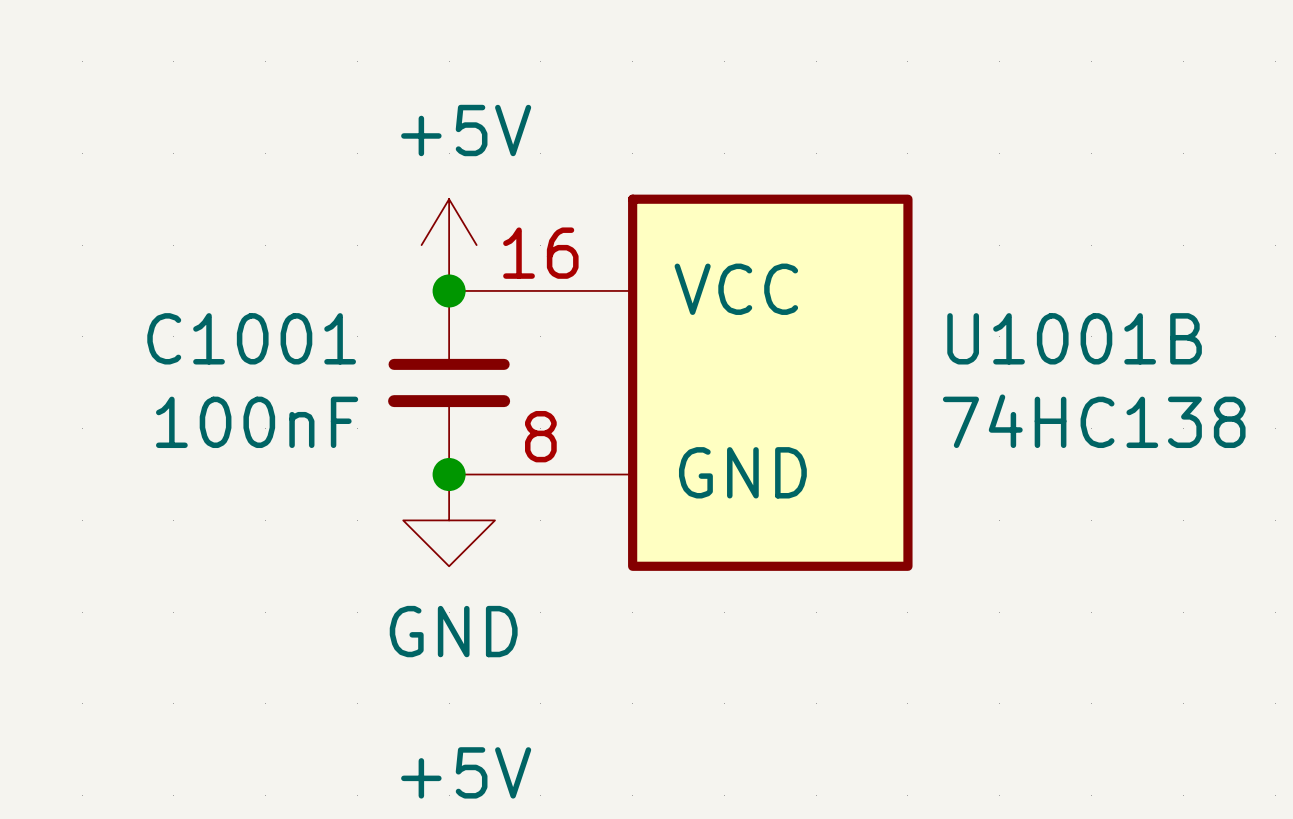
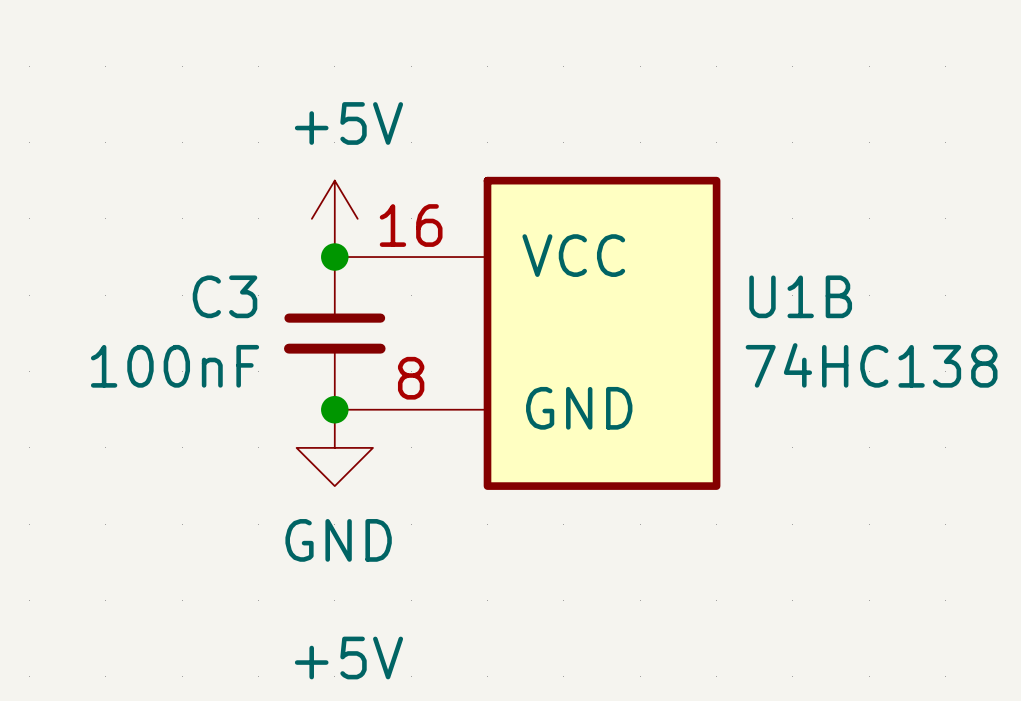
C1001 name: C1001 (251, 338) -> C3 (225, 296)
U1001B name: U1001B (1074, 338) -> U1B (800, 296)

